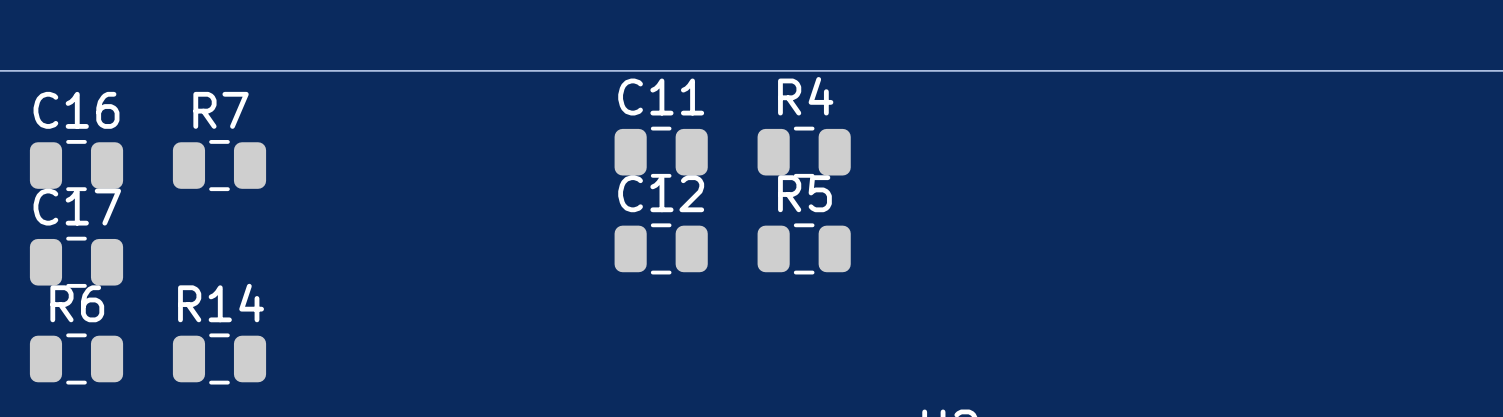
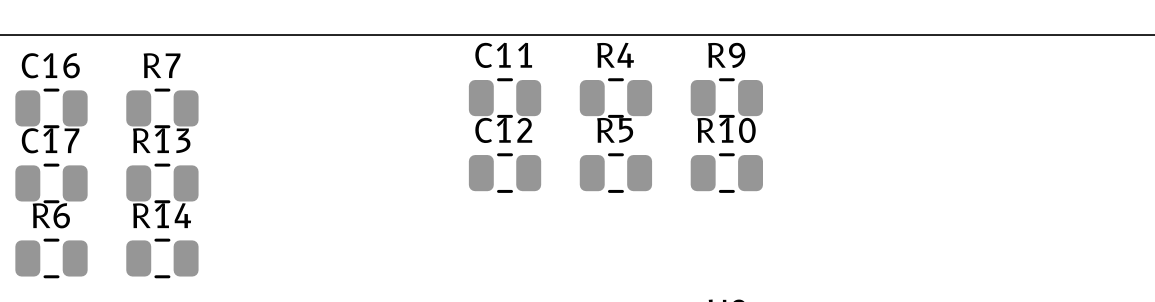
R9: none -> (726, 98)
R10: none -> (726, 173)
R13: none -> (162, 183)

